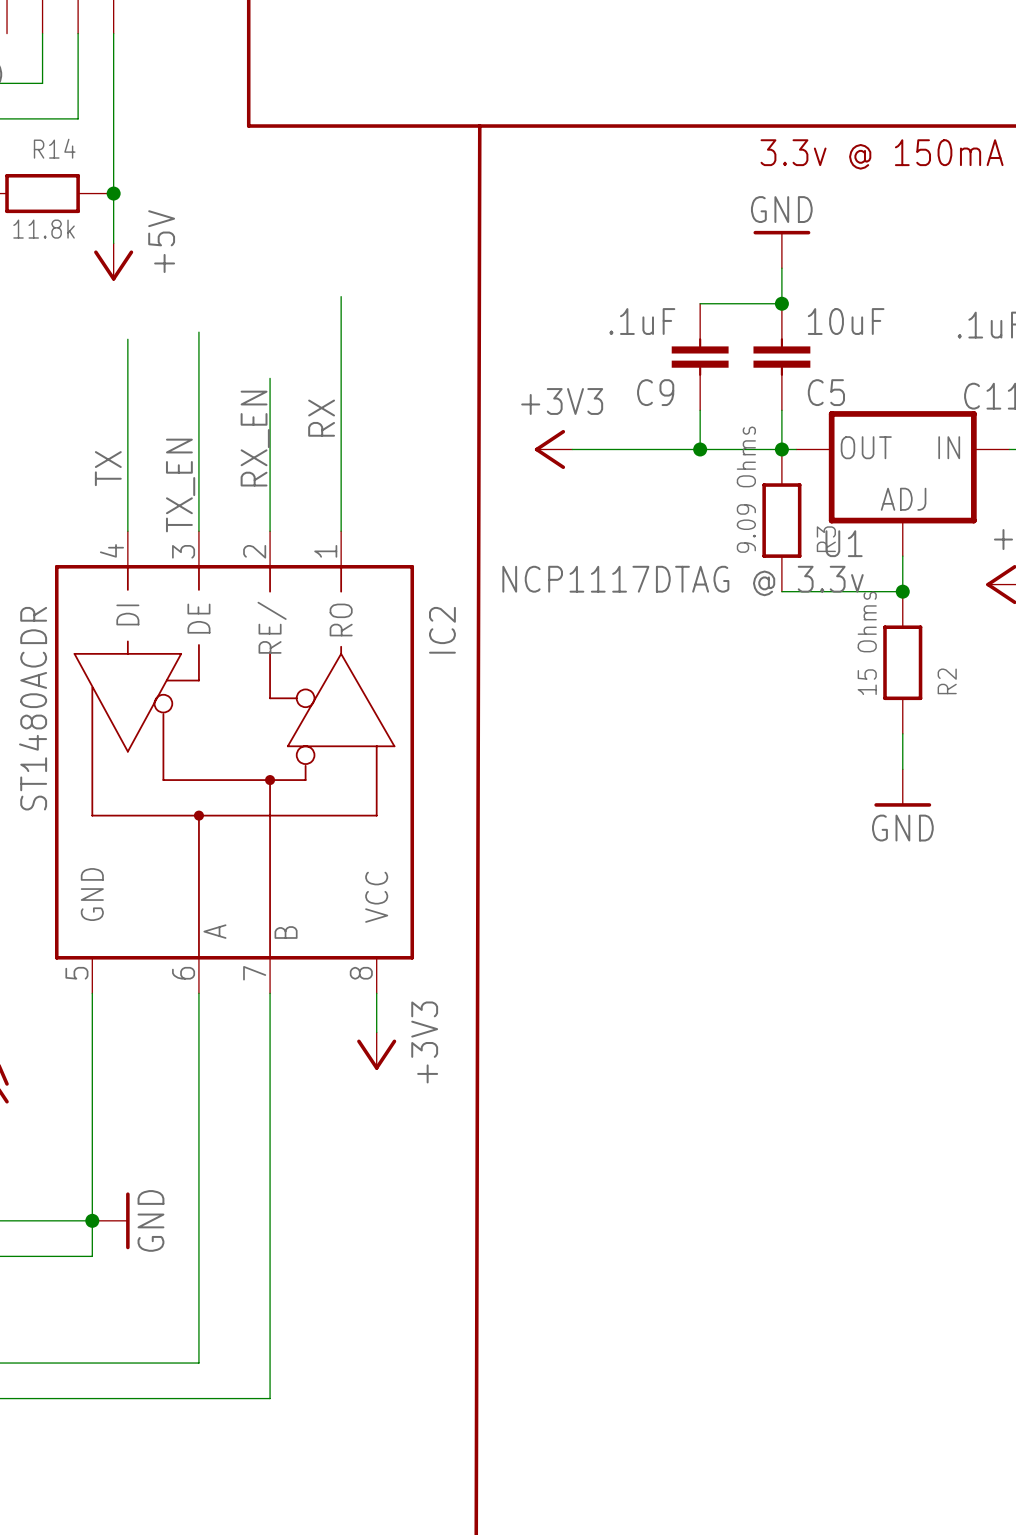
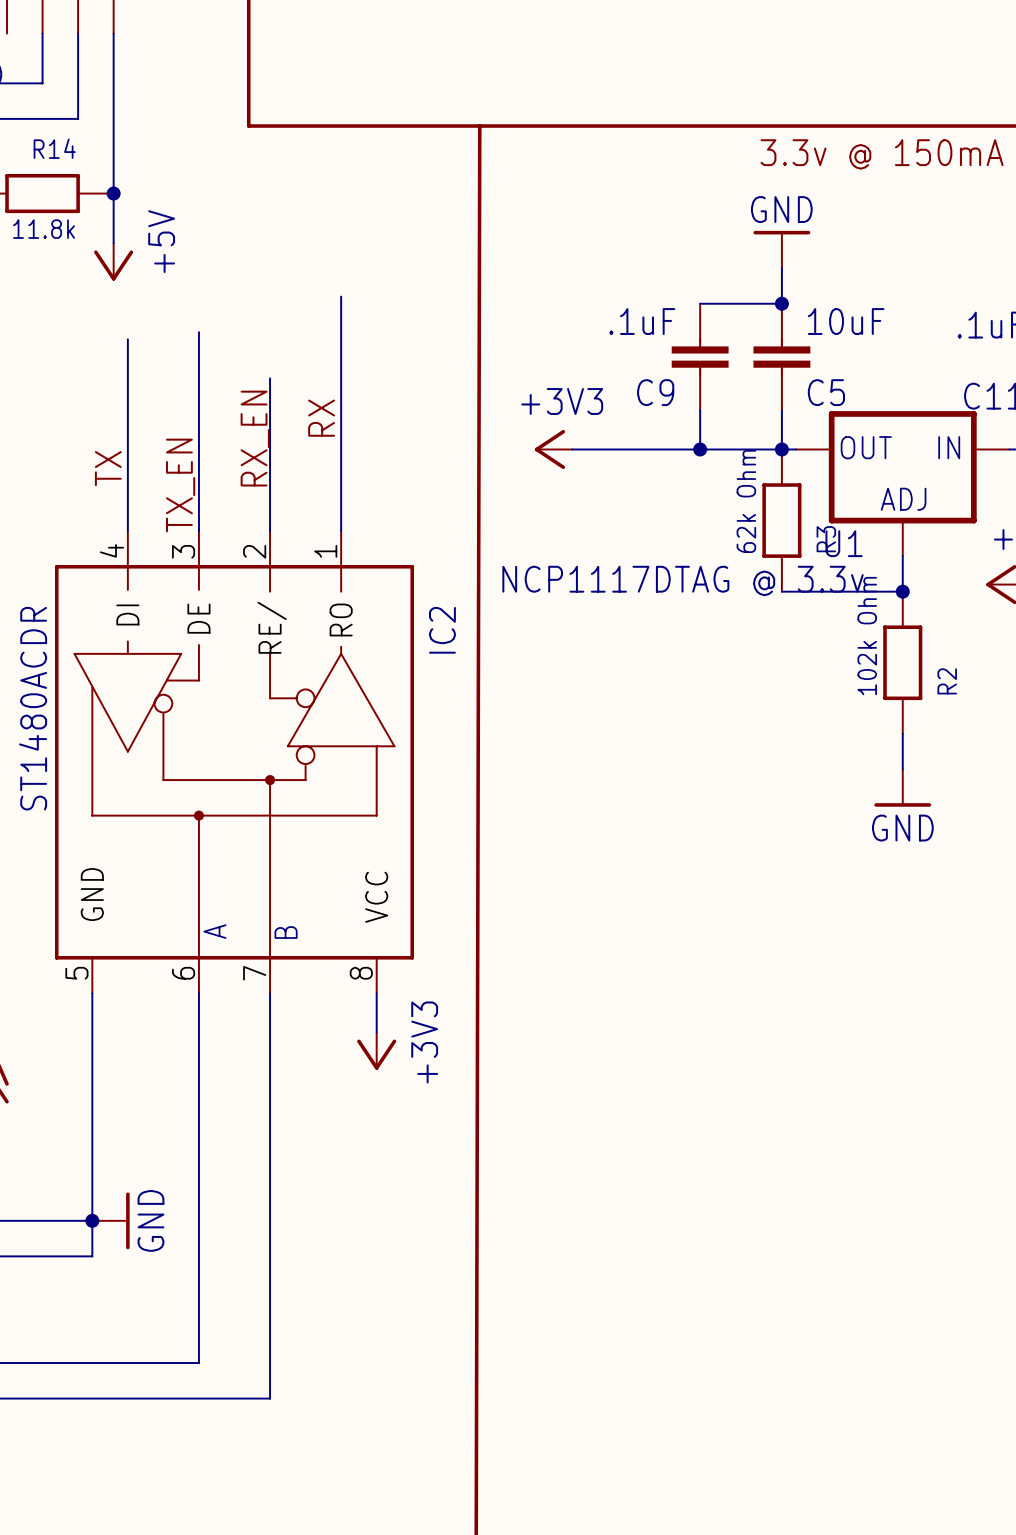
R3 value: 9.09 Ohms (746, 489) -> 62k Ohm (746, 501)
R2 value: 15 Ohms (867, 643) -> 102k Ohm (867, 636)

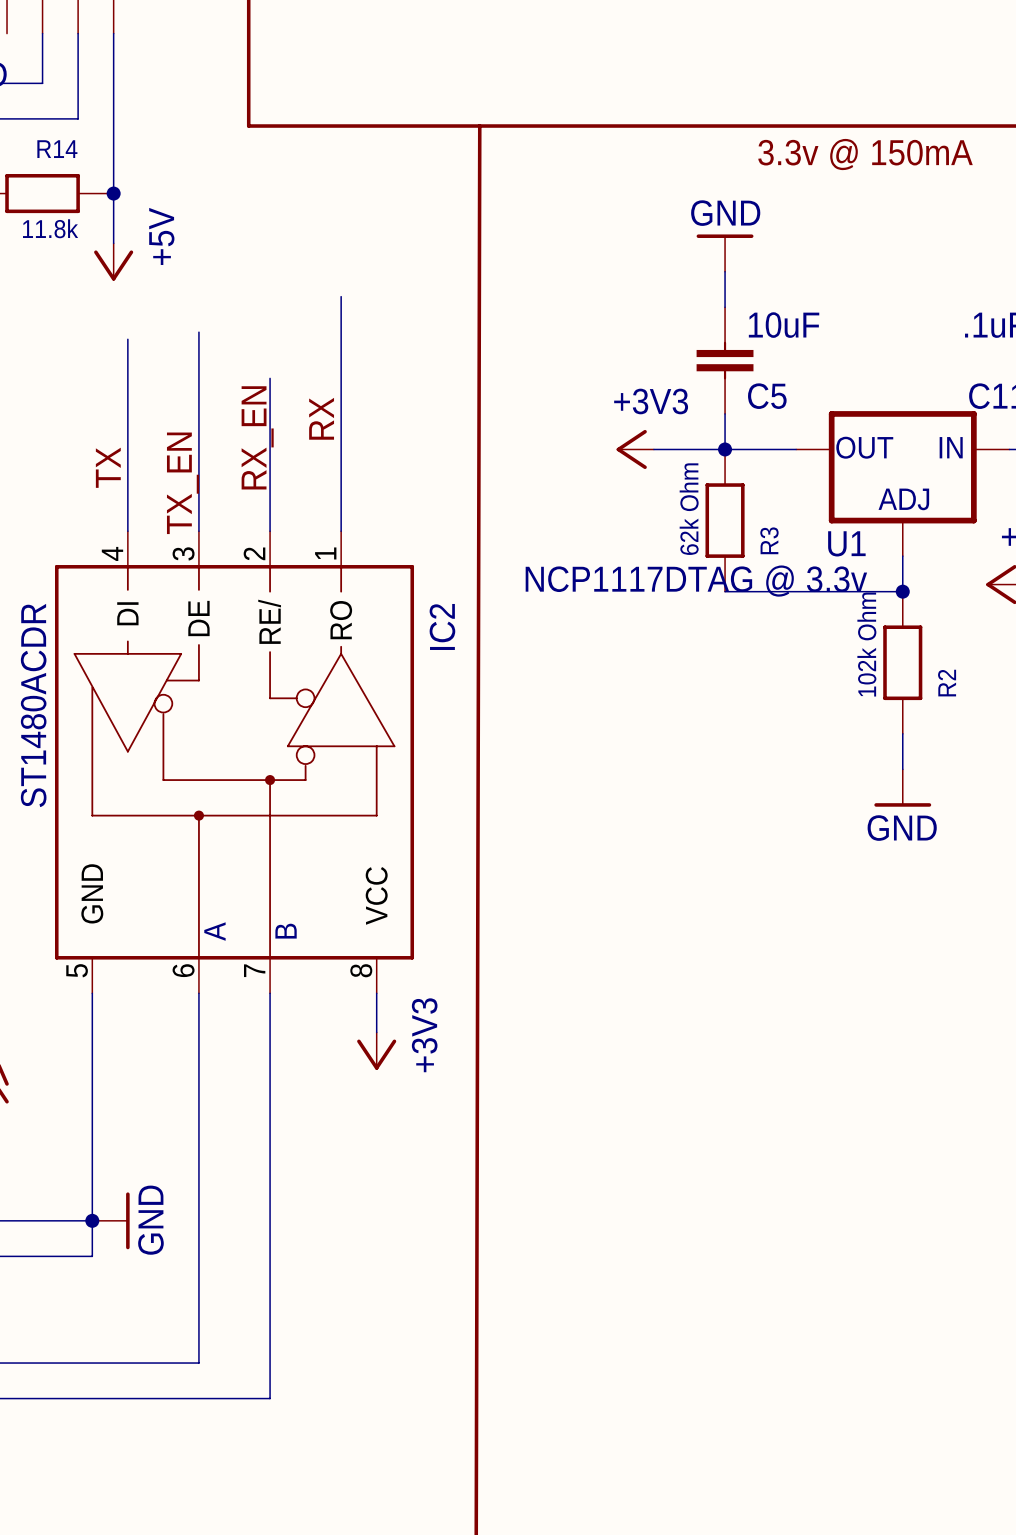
power symbol position: GND (781, 249) -> GND (725, 253)
wire: (781, 268) (781, 303) (700, 303) -> none
wire: none -> (725, 271) (725, 307)
junction: (781, 303) -> none
C9: .1uF (700, 357) -> none
C5 position: (781, 357) -> (725, 360)
wire: (700, 410) (700, 449) -> none
wire: (781, 410) (781, 449) -> none
wire: none -> (725, 413) (725, 449)
power symbol position: +3V3 (553, 449) -> +3V3 (635, 449)
wire: (572, 449) (653, 449) -> none
junction position: (700, 449) -> (725, 449)
junction: (781, 449) -> none
R3 position: (781, 520) -> (725, 520)
wire: none -> (725, 591) (781, 591)

